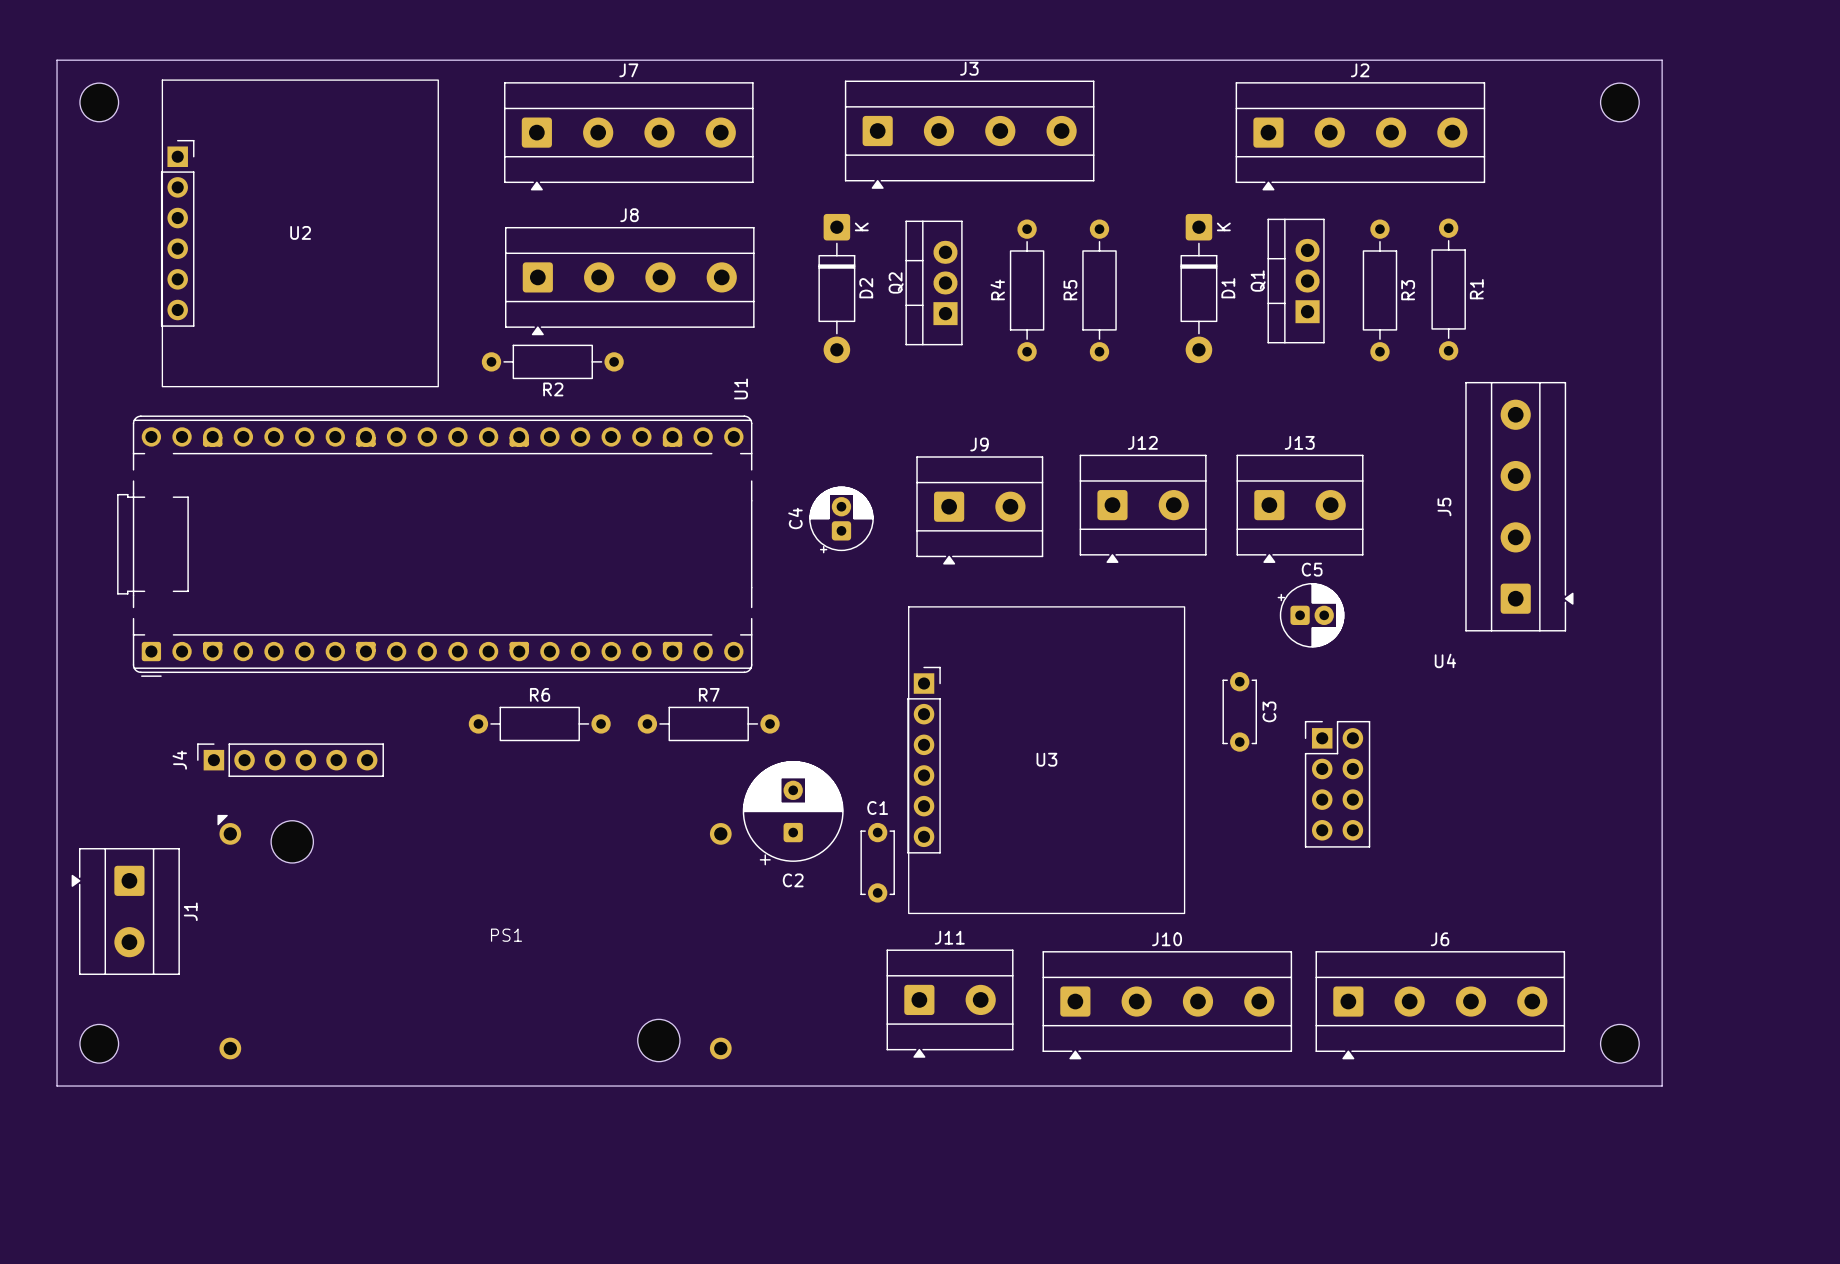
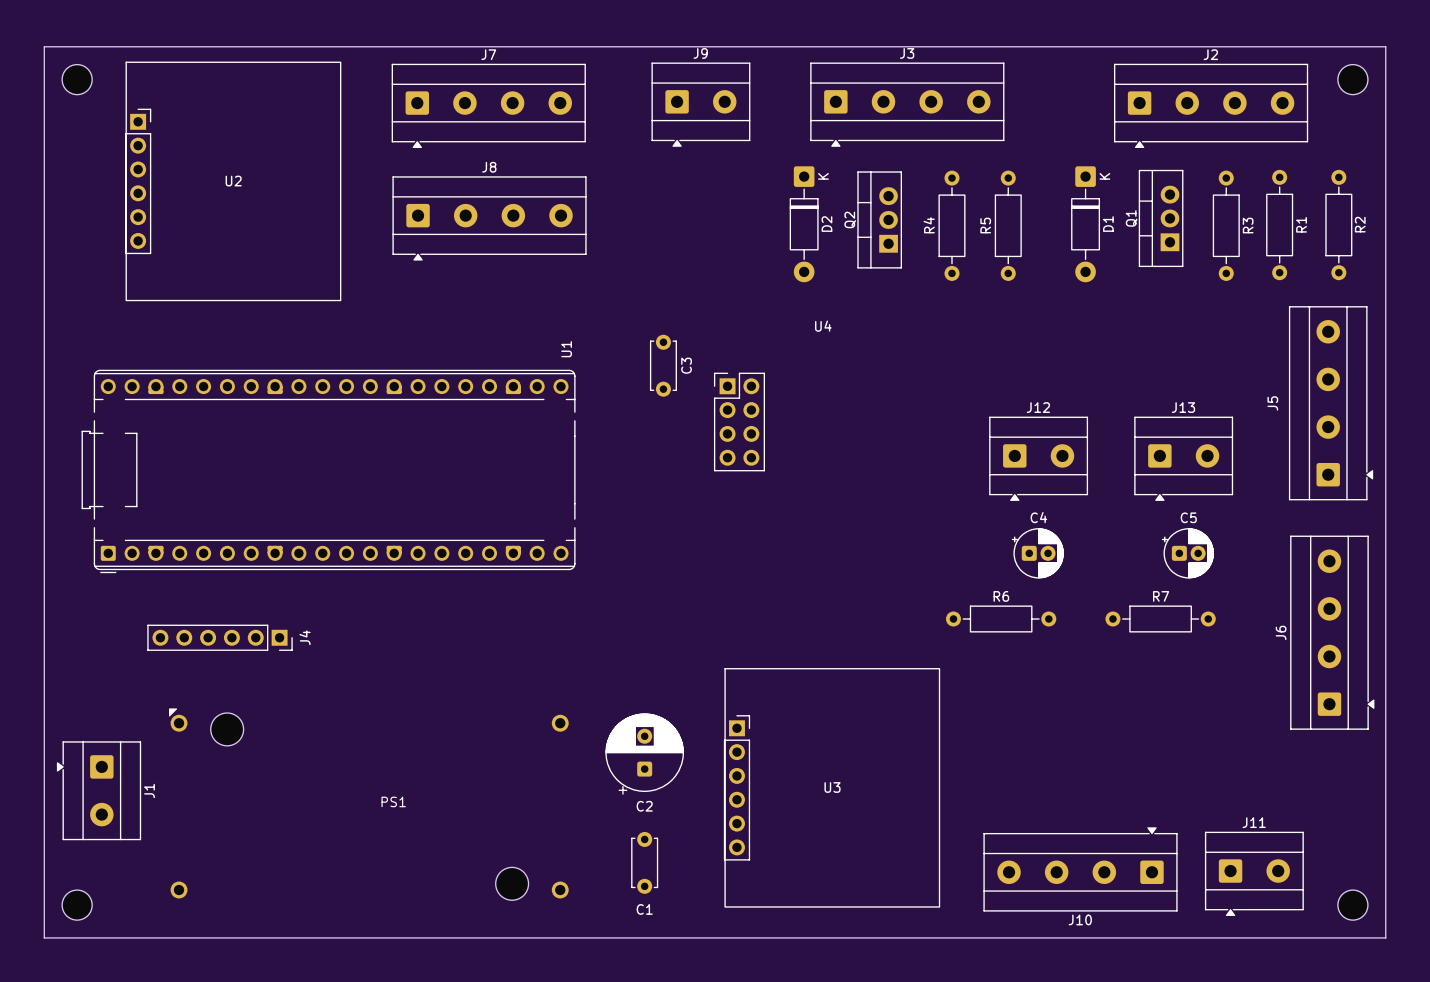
board edge: (1662, 60) (1662, 1086) (57, 1086) -> (1291, 46) (1385, 46) (1385, 937) (44, 937) (44, 844)
part position: (1619, 102) -> (1352, 79)
J3 position: (969, 134) -> (907, 104)
J2 position: (1360, 136) -> (1211, 105)
Q1 position: (1296, 281) -> (1161, 218)
Q2 position: (934, 282) -> (879, 219)
D2 position: (836, 288) -> (804, 224)
D1 position: (1198, 288) -> (1085, 224)
R1 position: (1448, 289) -> (1279, 225)
R4 position: (1027, 290) -> (951, 225)
R5 position: (1099, 290) -> (1008, 225)
R3 position: (1379, 290) -> (1226, 225)
R2 rotation: 0° (552, 361) -> 90° clockwise (1338, 225)
R2 position: (552, 361) -> (1338, 225)
R2 name position: R2 (553, 389) -> R2 (1360, 224)
J5 position: (1519, 506) -> (1331, 403)
J12 position: (1143, 508) -> (1038, 458)
J13 position: (1300, 508) -> (1183, 458)
J9 position: (979, 510) -> (700, 104)
C4 rotation: 0° (841, 519) -> 90° clockwise (1037, 553)
C4 position: (841, 519) -> (1037, 553)
U1 position: (434, 546) -> (328, 471)
C5 position: (1311, 615) -> (1187, 553)
C3 position: (1239, 711) -> (663, 365)
R6 position: (539, 723) -> (1001, 619)
R7 position: (708, 723) -> (1160, 619)
J4 rotation: 0° (290, 760) -> 180° (220, 637)
U3 position: (1046, 760) -> (831, 787)
U4 position: (1337, 784) -> (739, 422)
C1 name position: C1 (877, 807) -> C1 (644, 909)
C2 position: (793, 813) -> (644, 754)
C1 position: (877, 862) -> (644, 862)
J1 position: (125, 911) -> (98, 790)
PS1 position: (474, 938) -> (368, 804)
J11 position: (950, 1003) -> (1254, 873)
J10 rotation: 0° (1167, 1005) -> 180° (1080, 869)
J10 position: (1167, 1005) -> (1080, 869)
J6 rotation: 0° (1440, 1005) -> 90° counterclockwise (1332, 632)
J6 position: (1440, 1005) -> (1332, 632)
part position: (99, 1043) -> (77, 905)
part position: (1619, 1043) -> (1352, 905)

